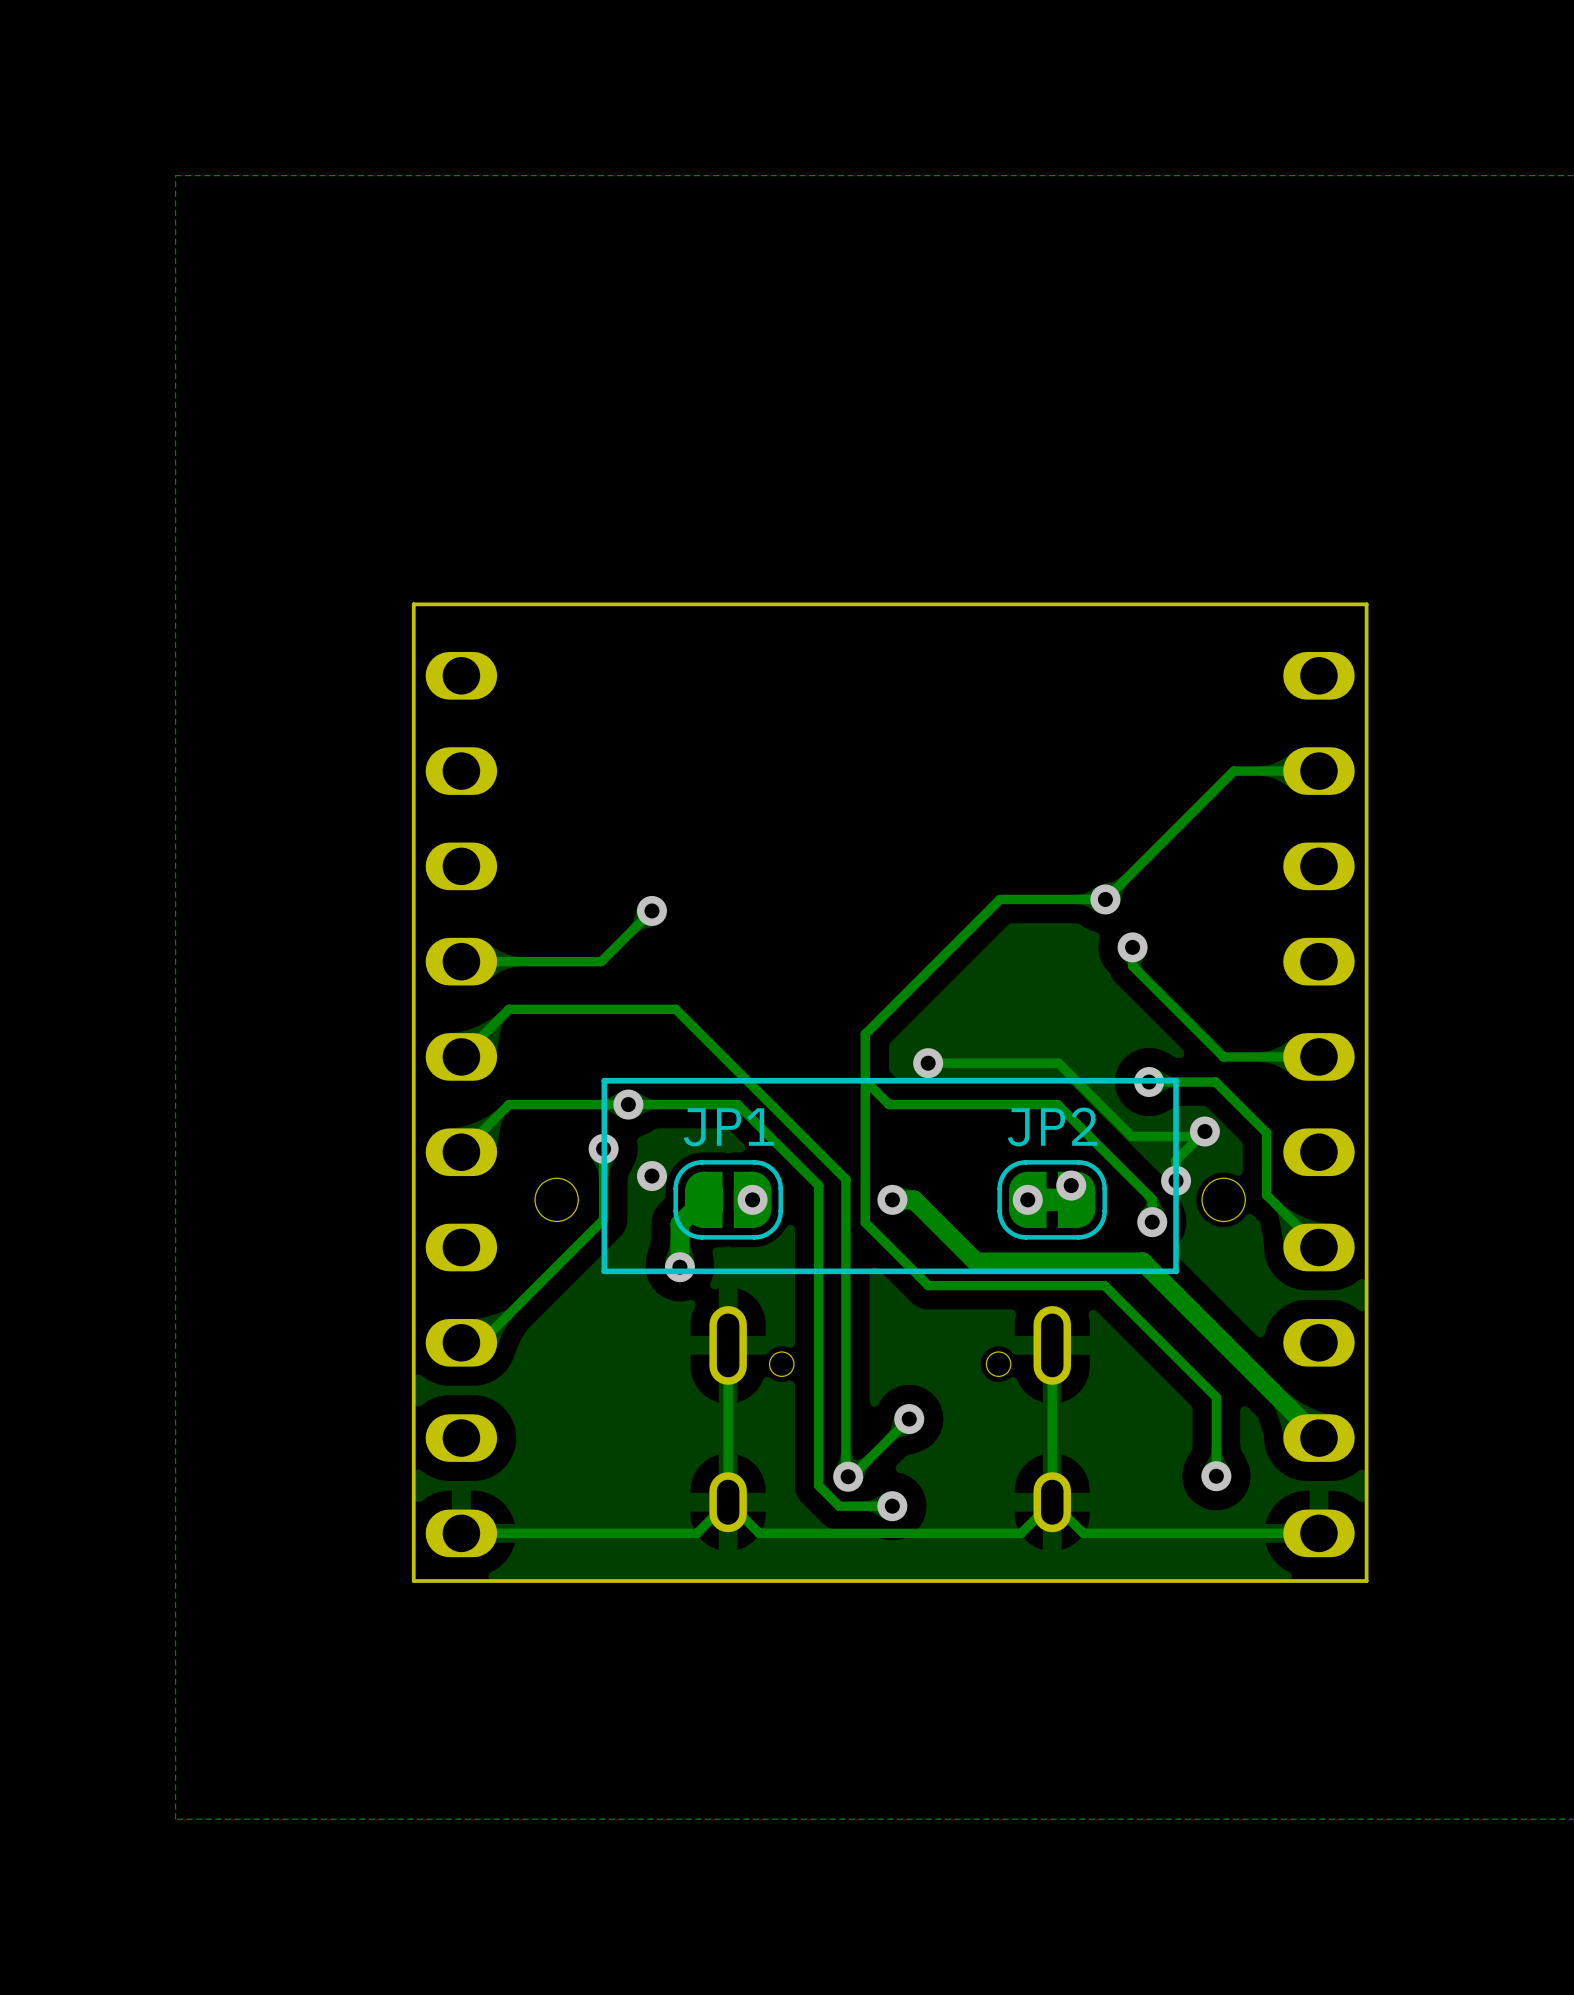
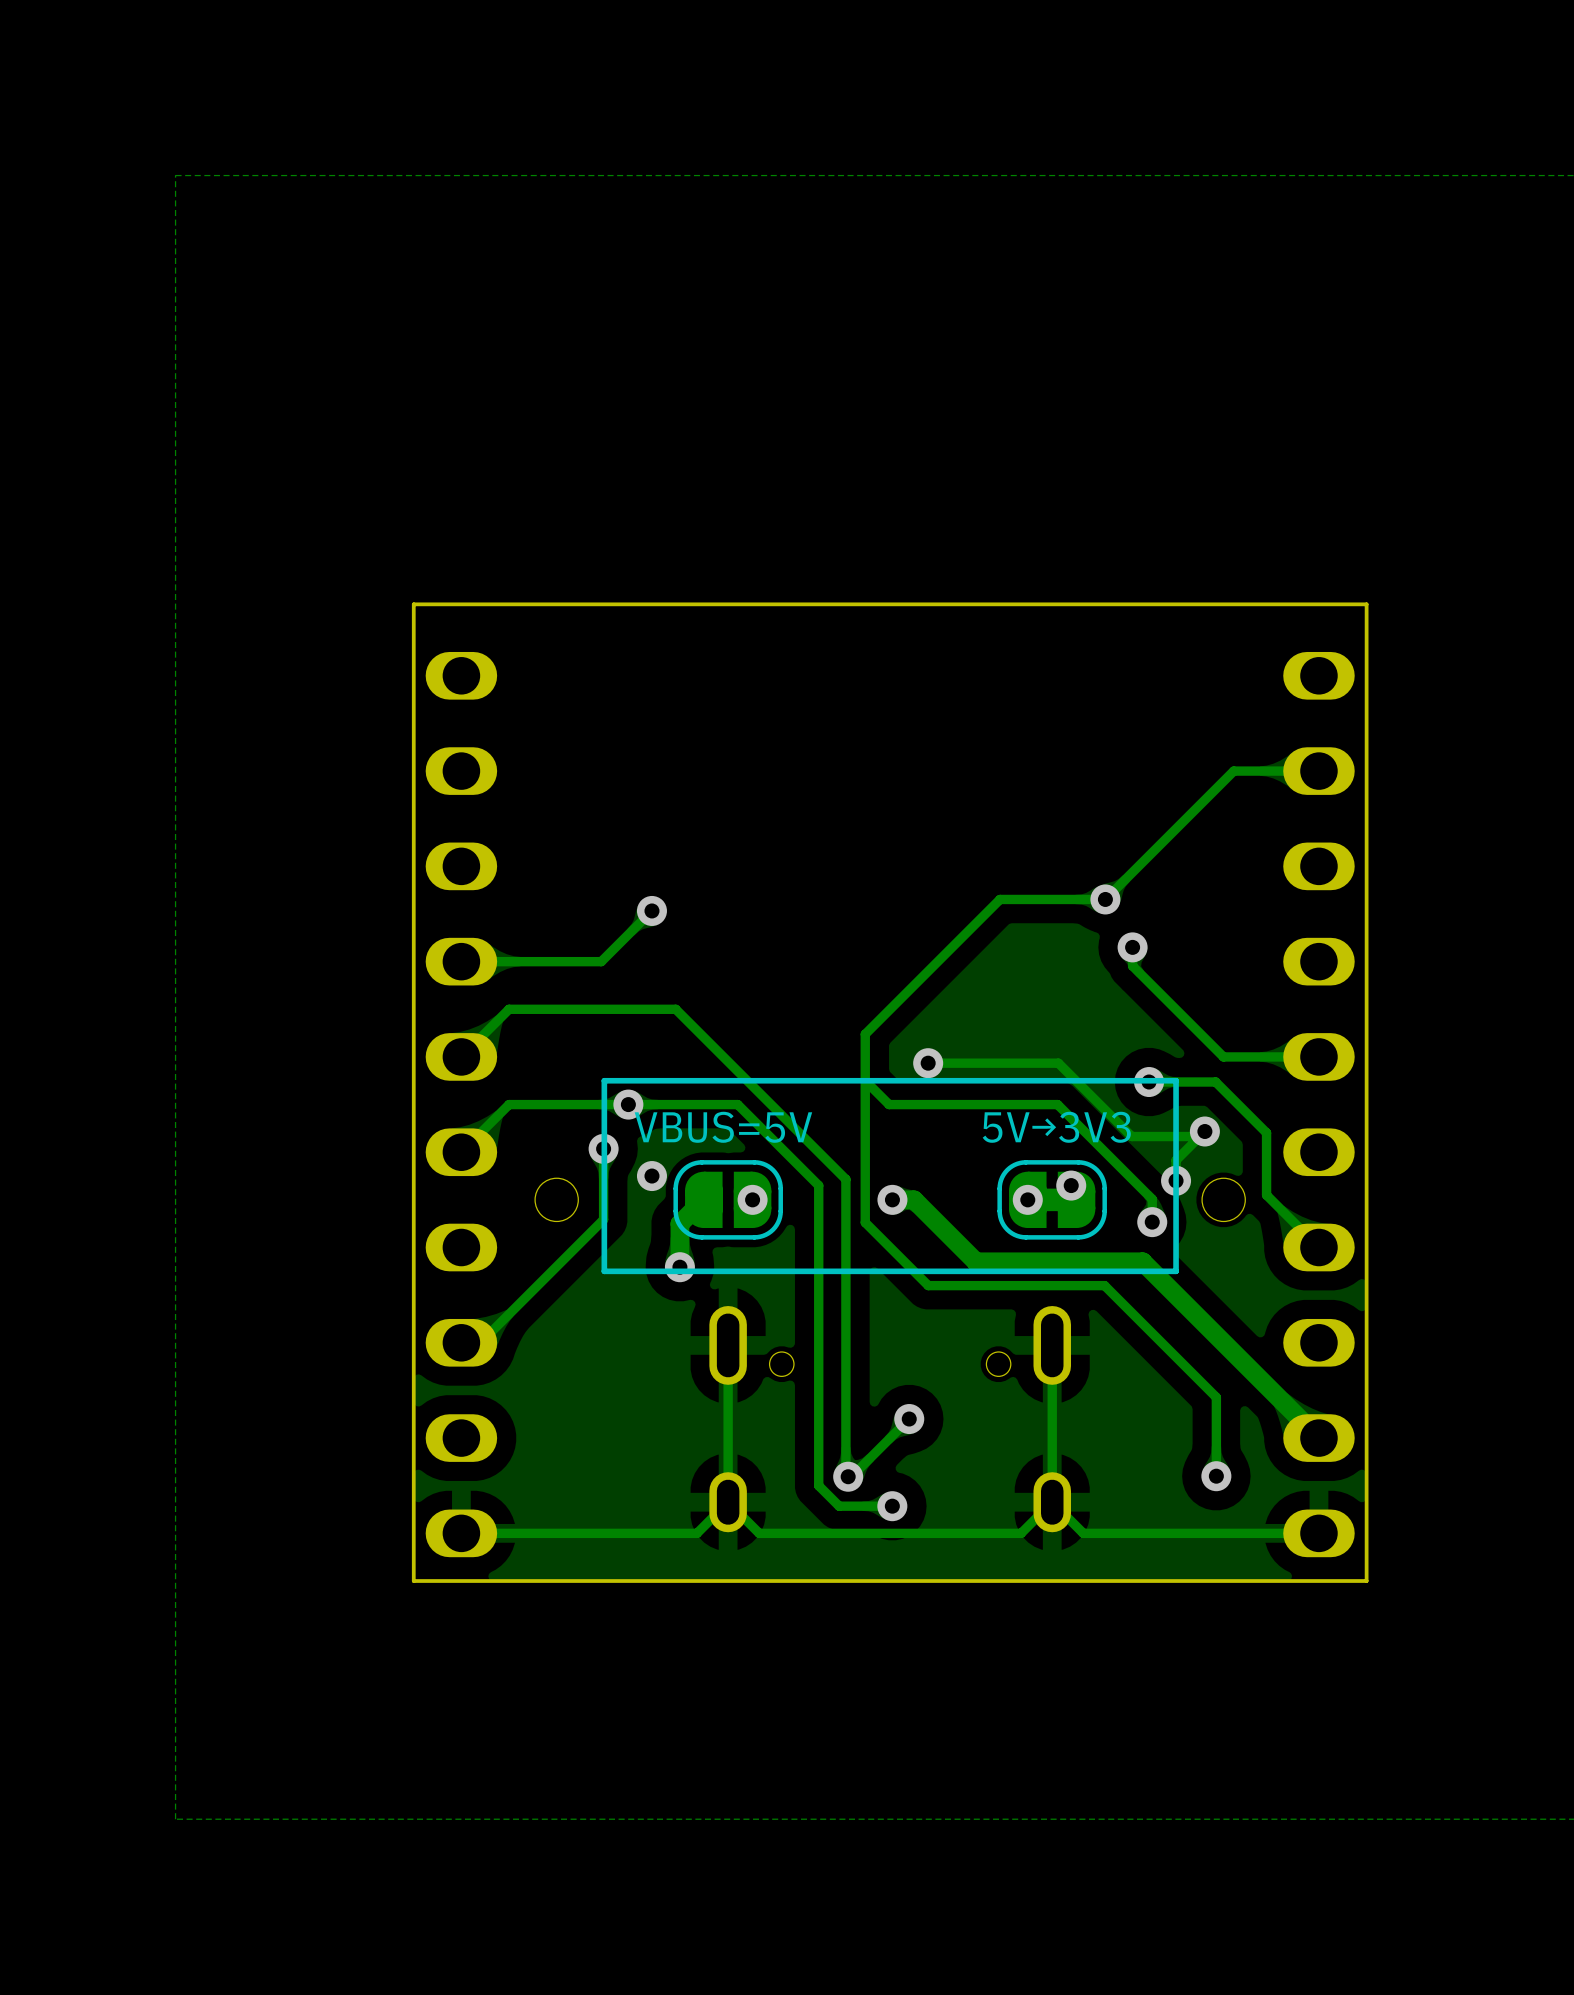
text: none -> VBUS=5V (723, 1127)
JP1 name: JP1 (728, 1127) -> none
JP2 name: JP2 (1052, 1127) -> none
text: none -> 5V→3V3 (1056, 1127)

